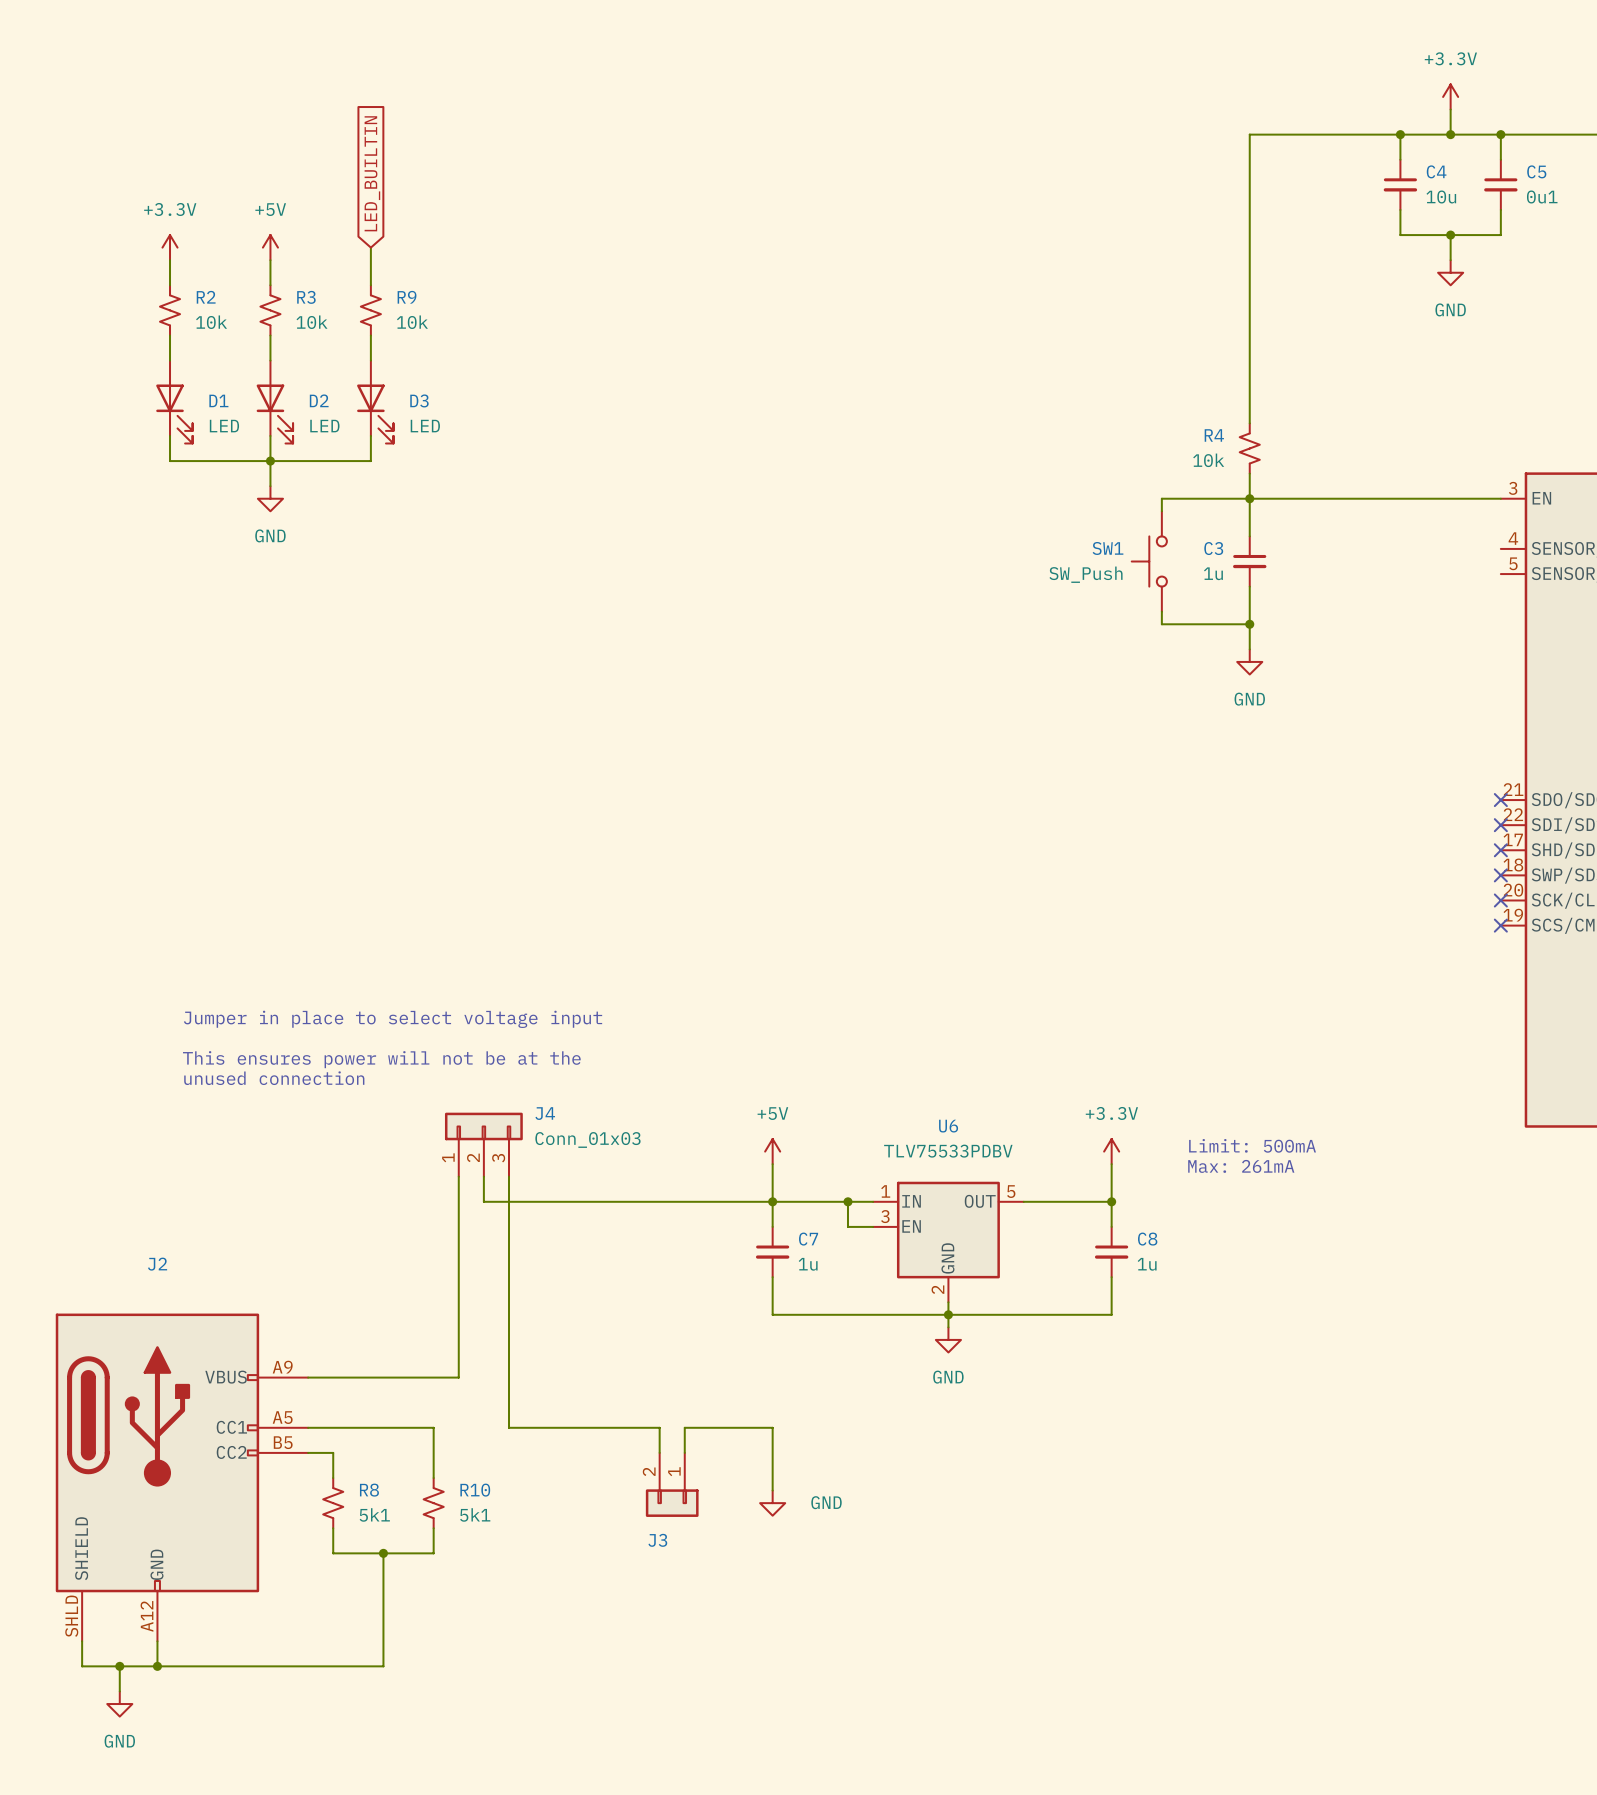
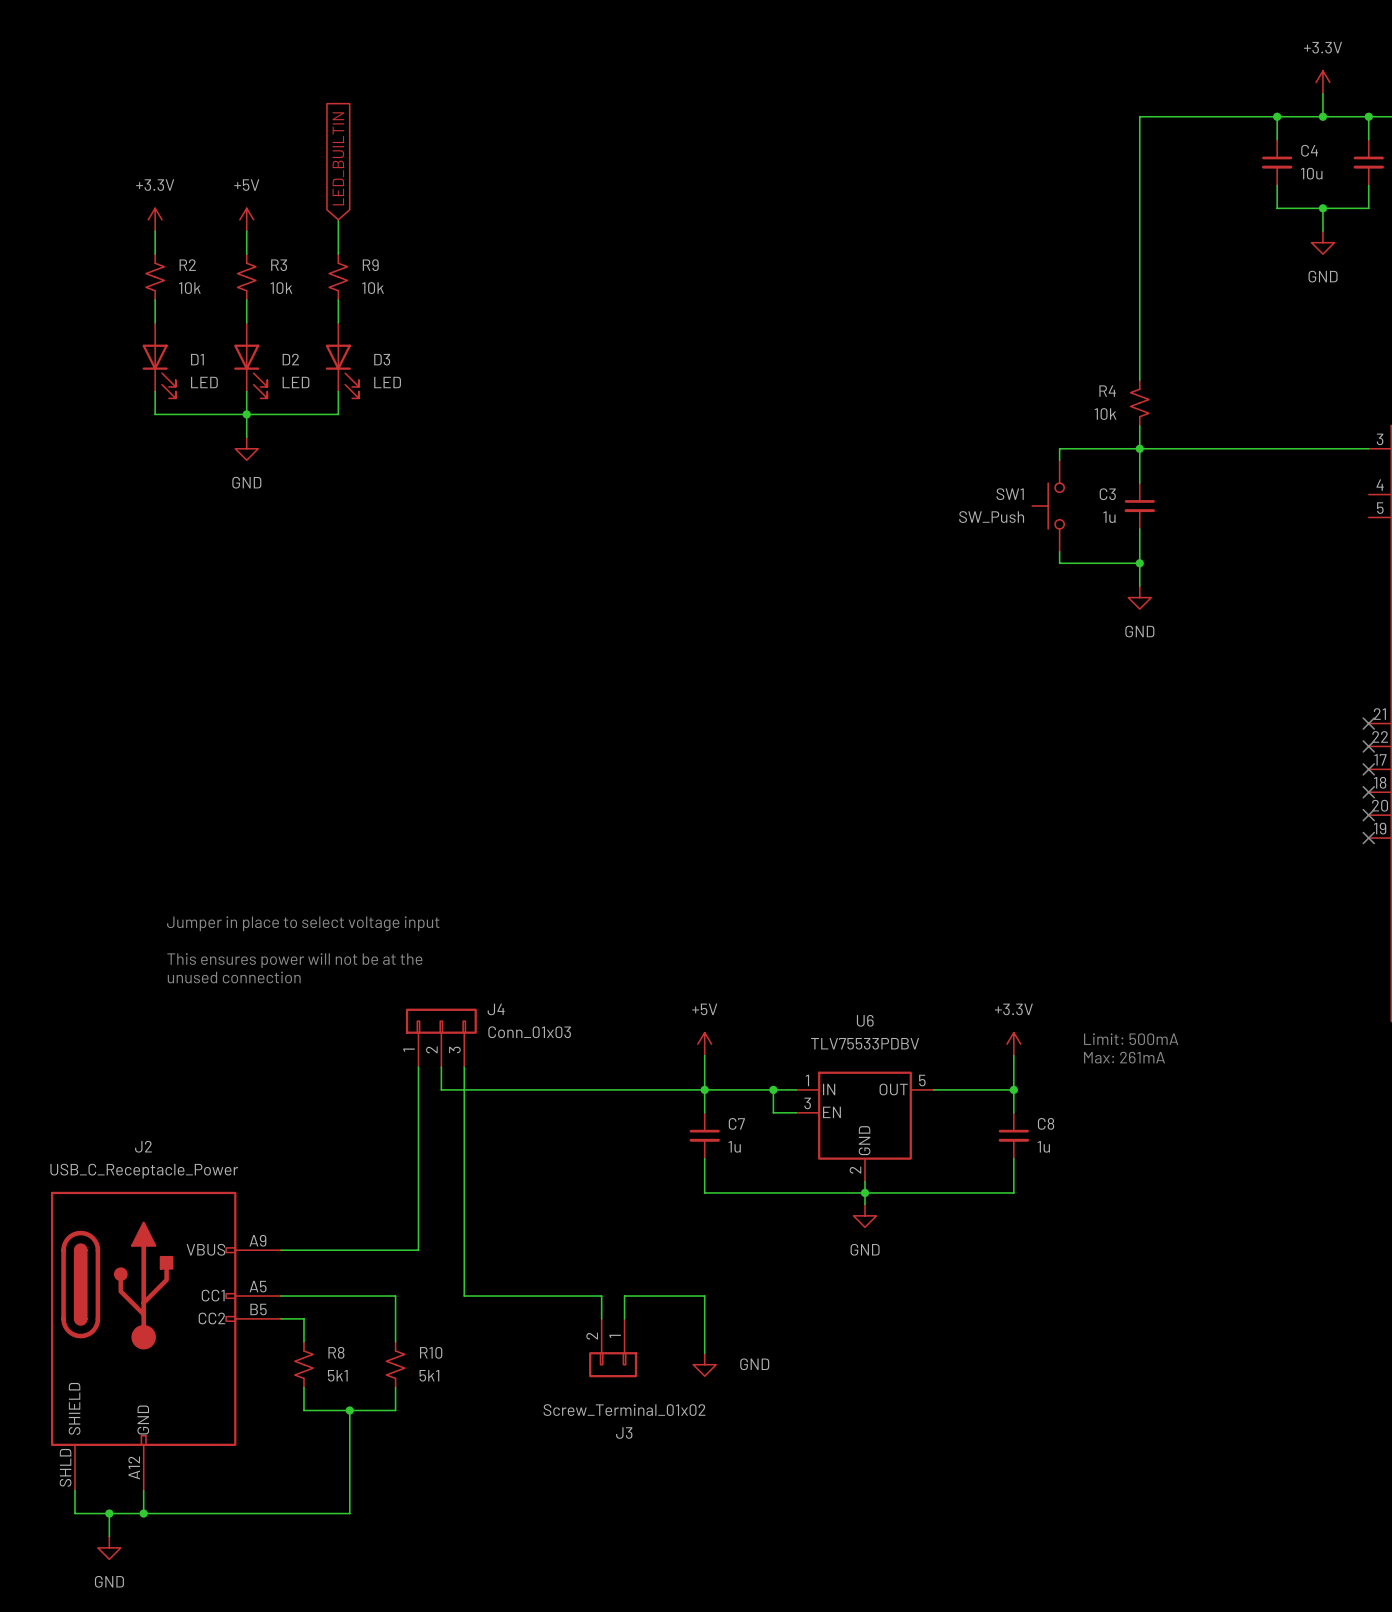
J2 value: none -> USB_C_Receptacle_Power (144, 1171)
J3 name position: J3 (657, 1540) -> J3 (624, 1433)
J3 value: none -> Screw_Terminal_01x02 (624, 1410)

